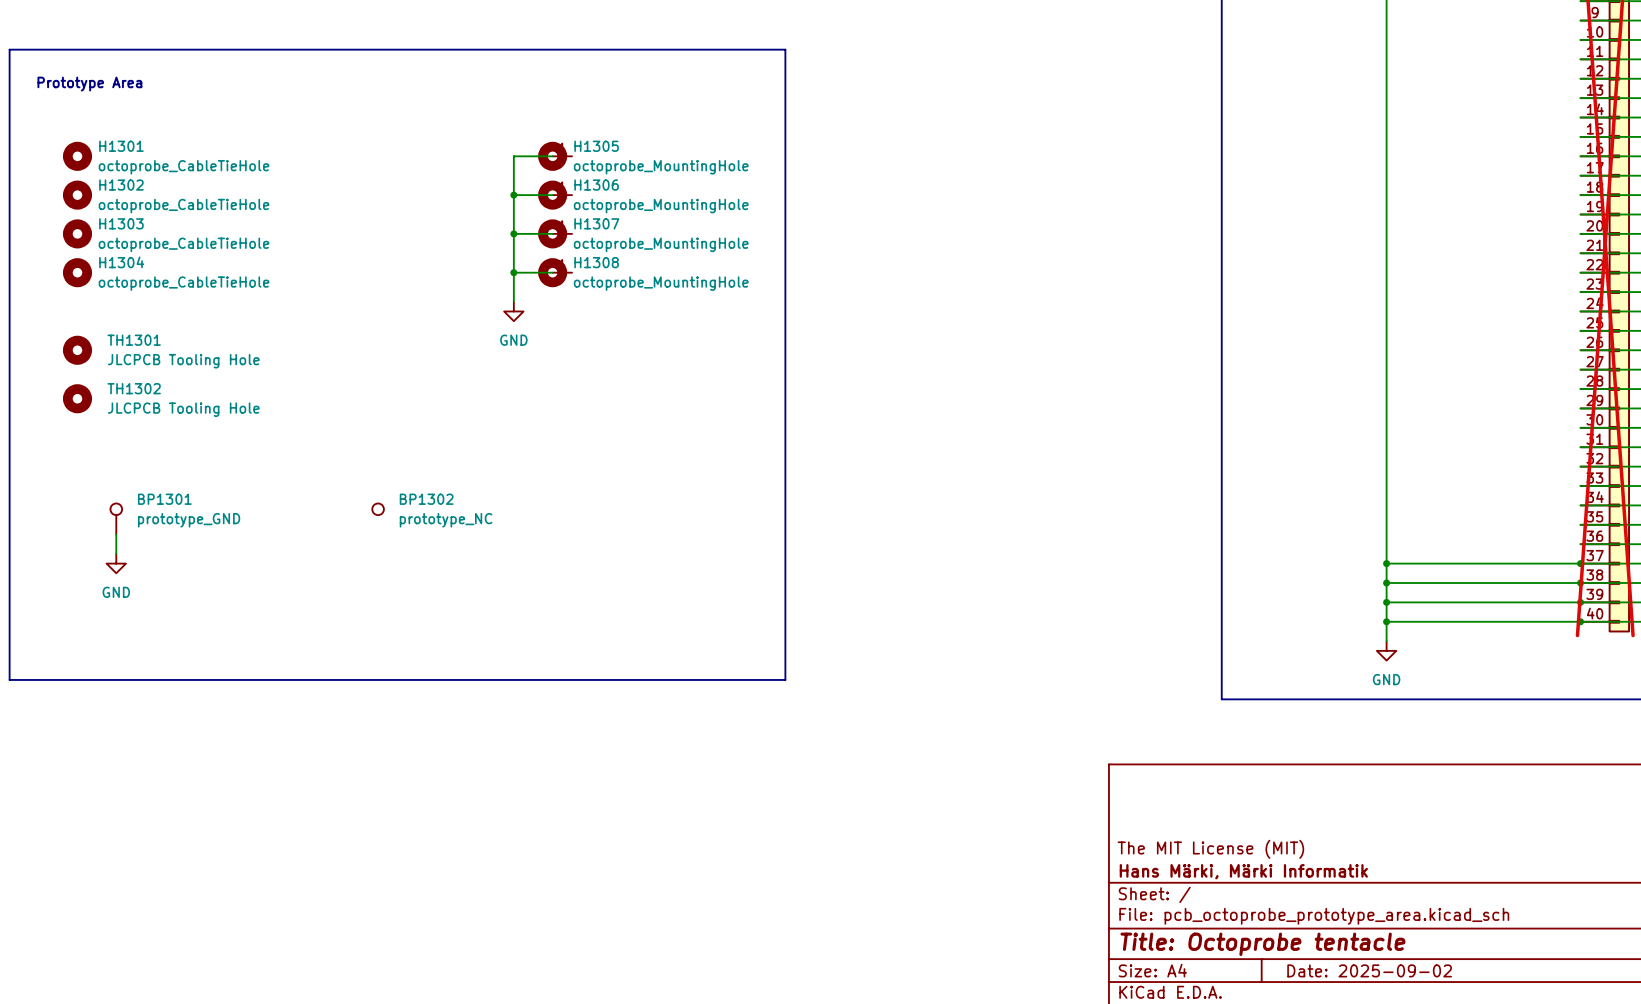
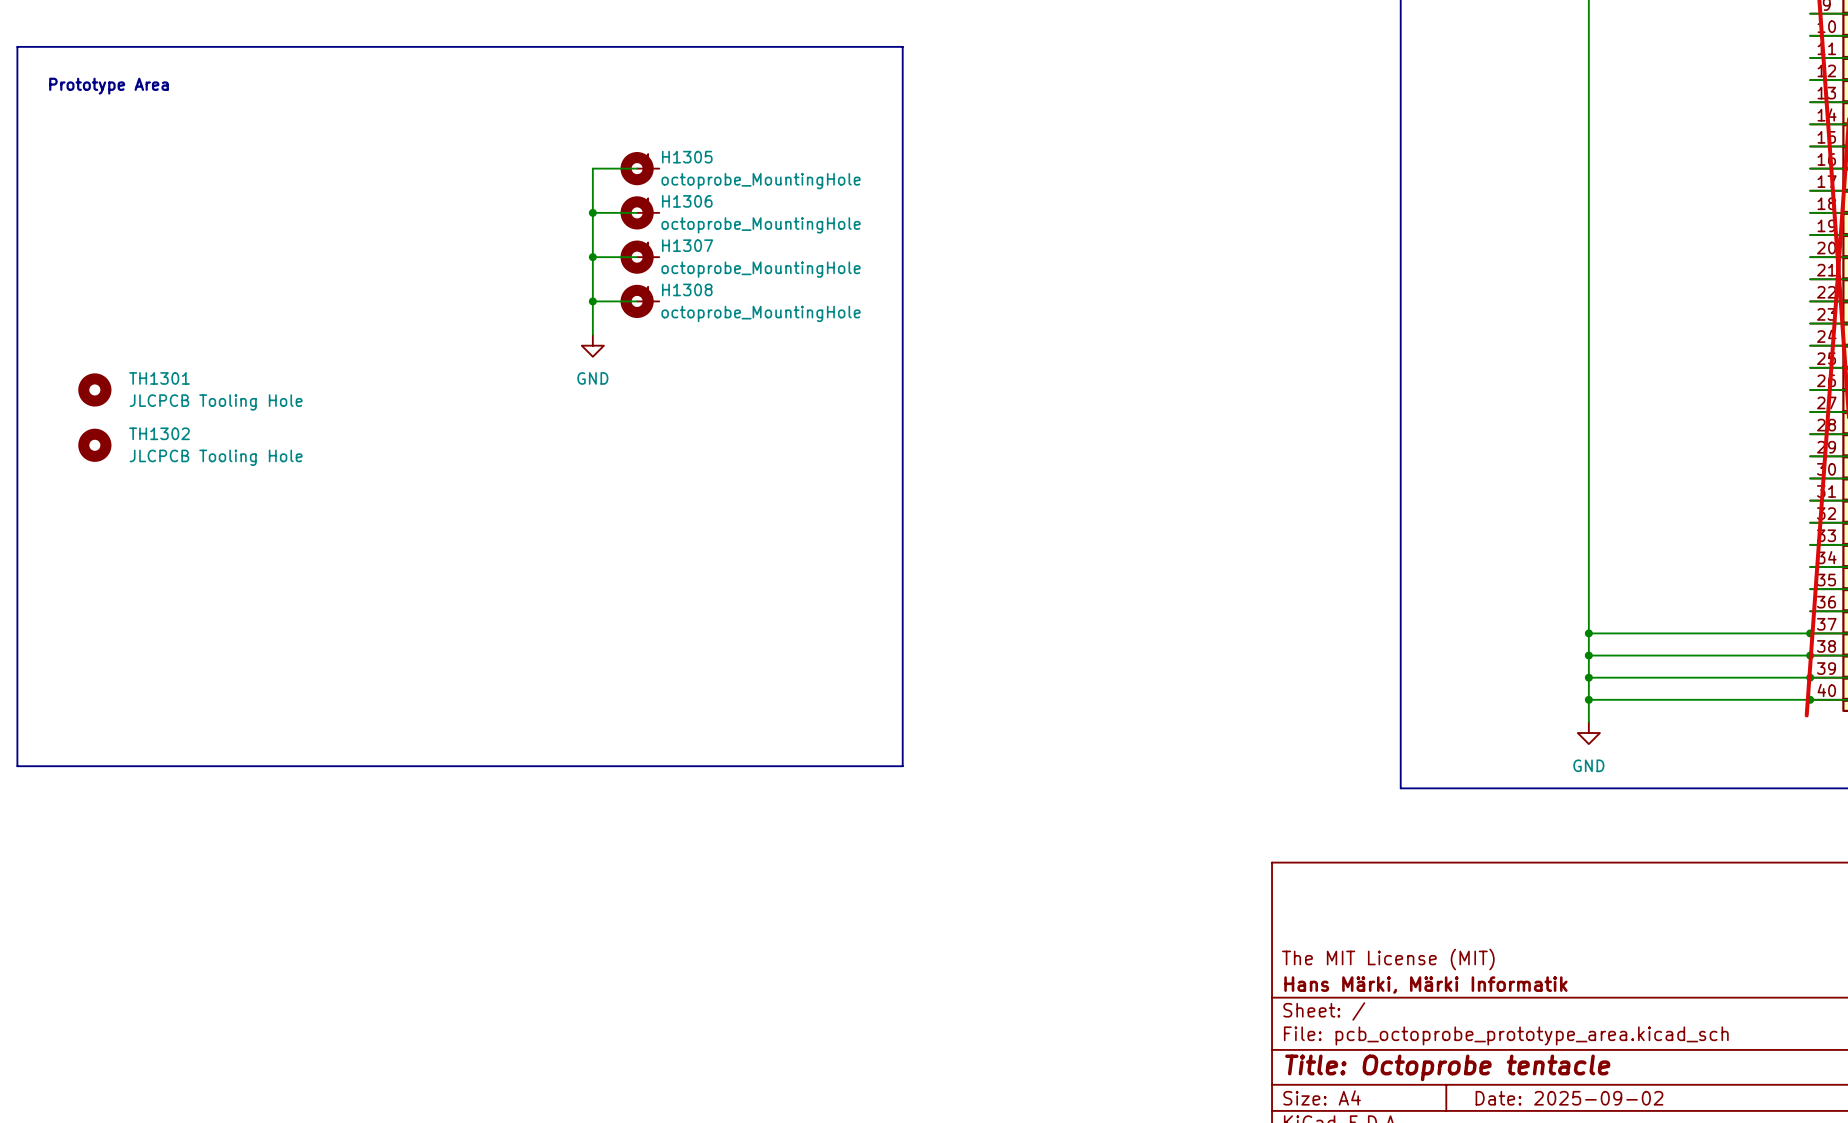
H1301: octoprobe_CableTieHole (77, 156) -> none
H1302: octoprobe_CableTieHole (77, 195) -> none
H1303: octoprobe_CableTieHole (77, 233) -> none
H1304: octoprobe_CableTieHole (77, 272) -> none
BP1302: prototype_NC (378, 509) -> none
BP1301: prototype_GND (116, 518) -> none
wire: (116, 534) (116, 553) -> none
power symbol: GND (116, 563) -> none

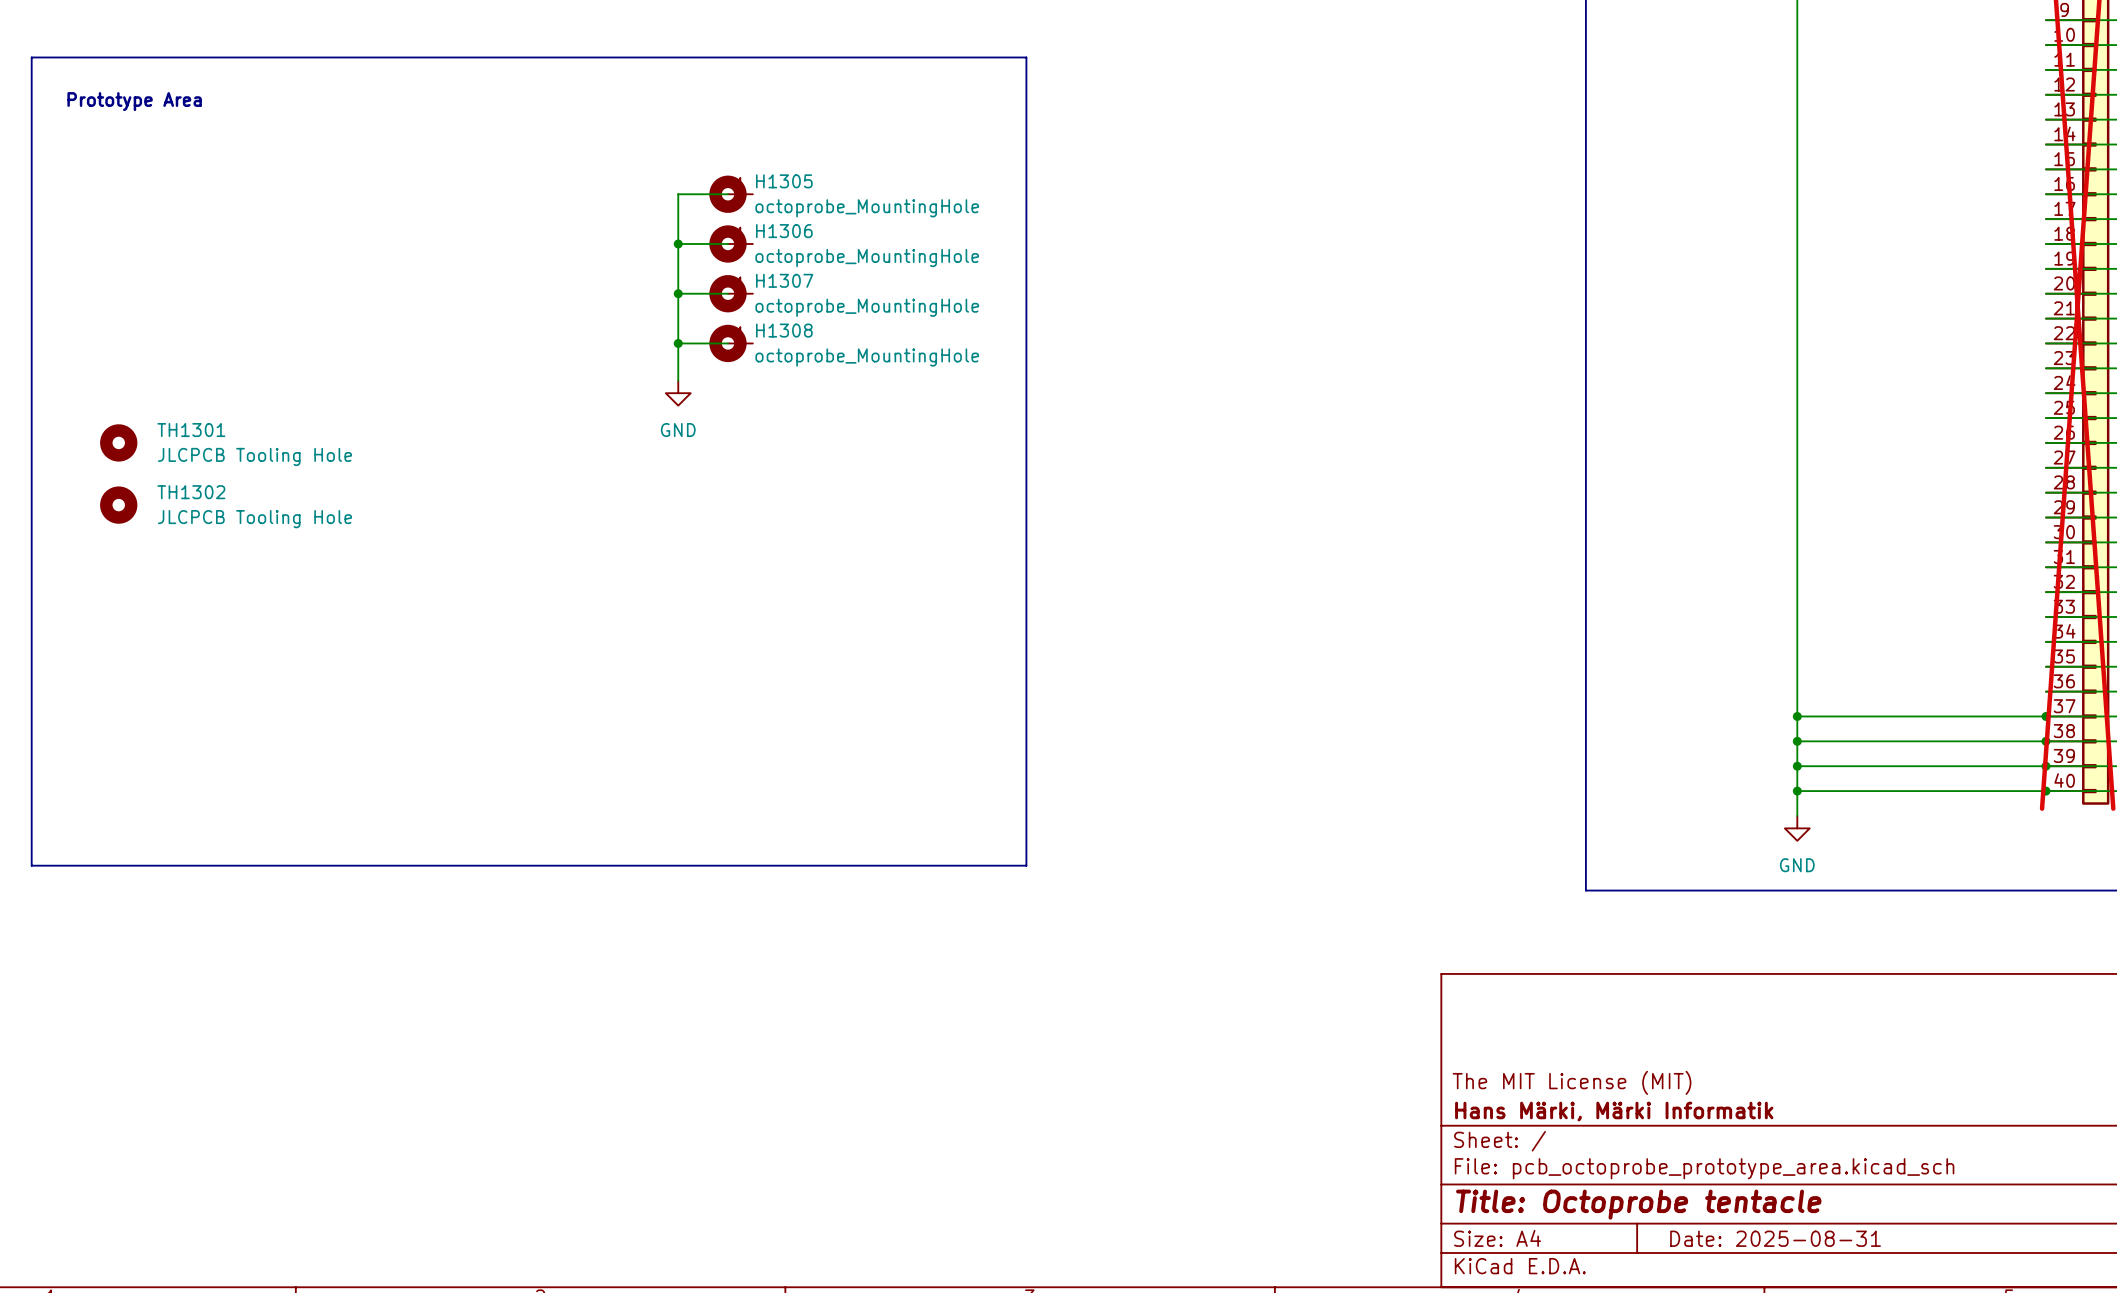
title block: Date: 2025-09-02 (1569, 1098) -> Date: 2025-08-31 (1775, 1238)

